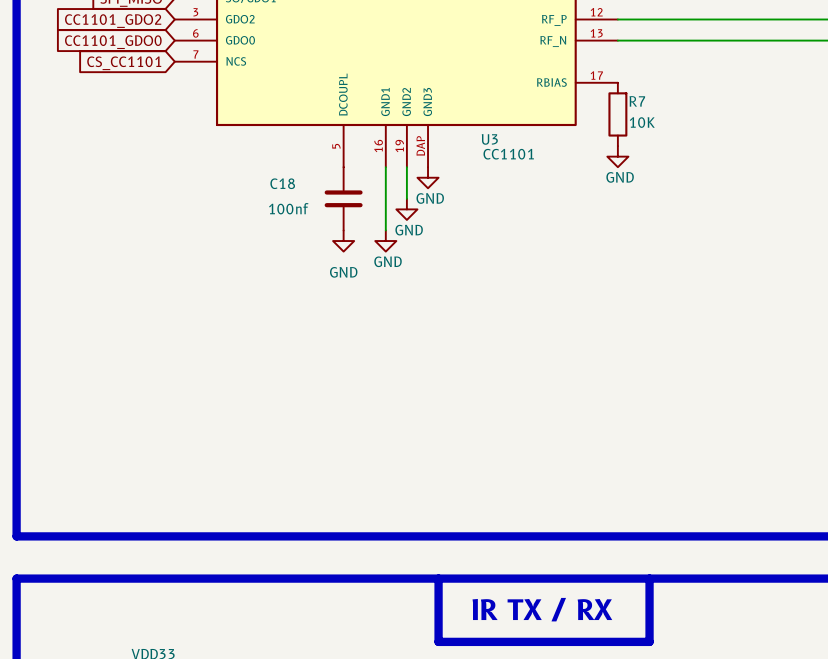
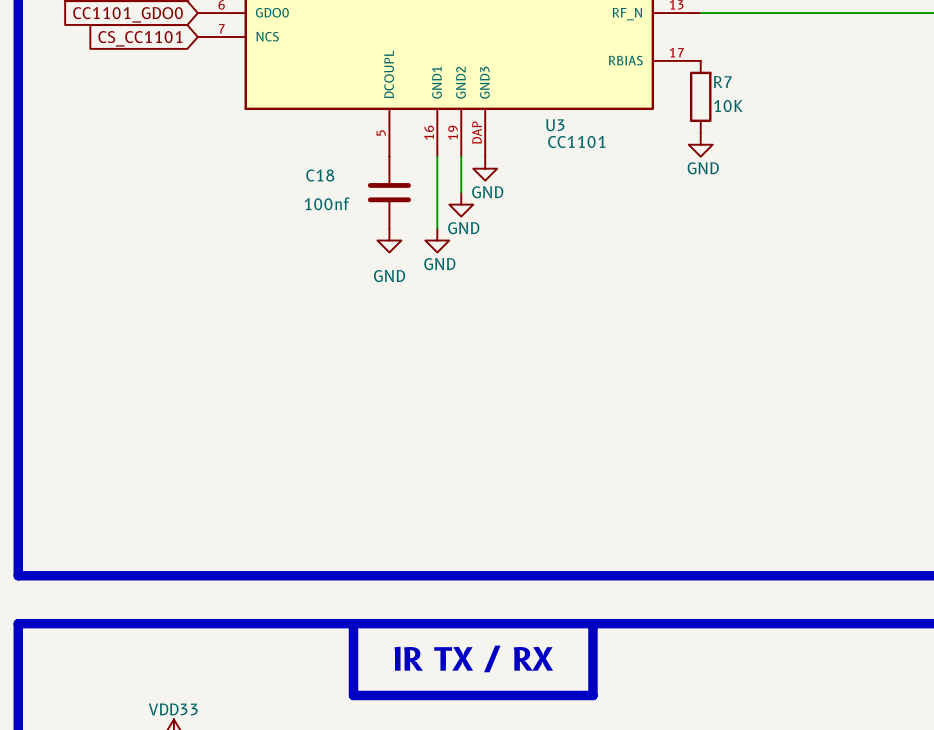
line: (438, 578) (438, 641) -> (353, 623) (353, 695) (497, 695)
line: (649, 578) (649, 641) (522, 641) -> (592, 623) (592, 695)
text position: IR TX / RX (542, 609) -> IR TX / RX (473, 658)

